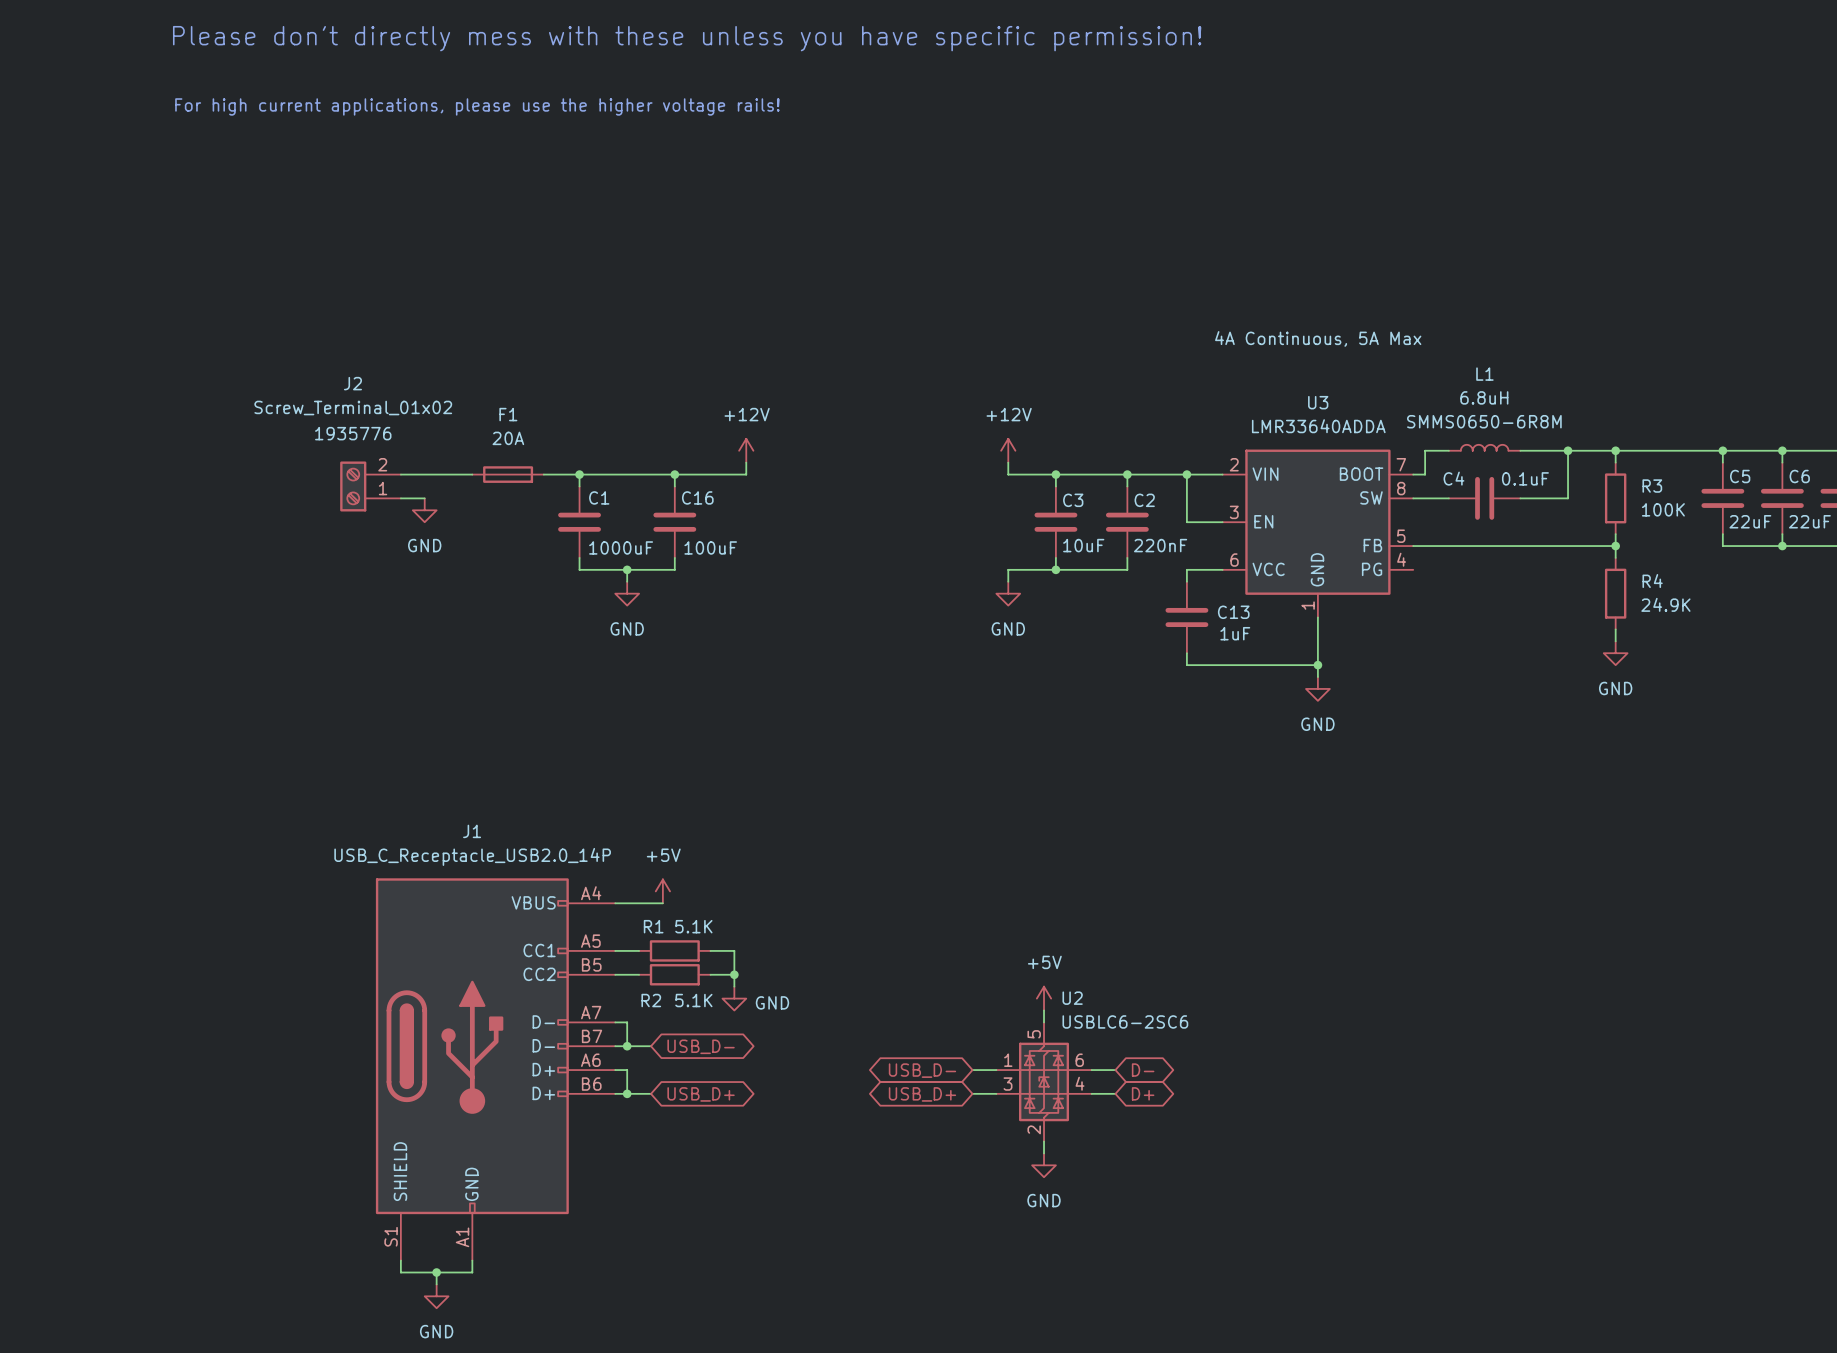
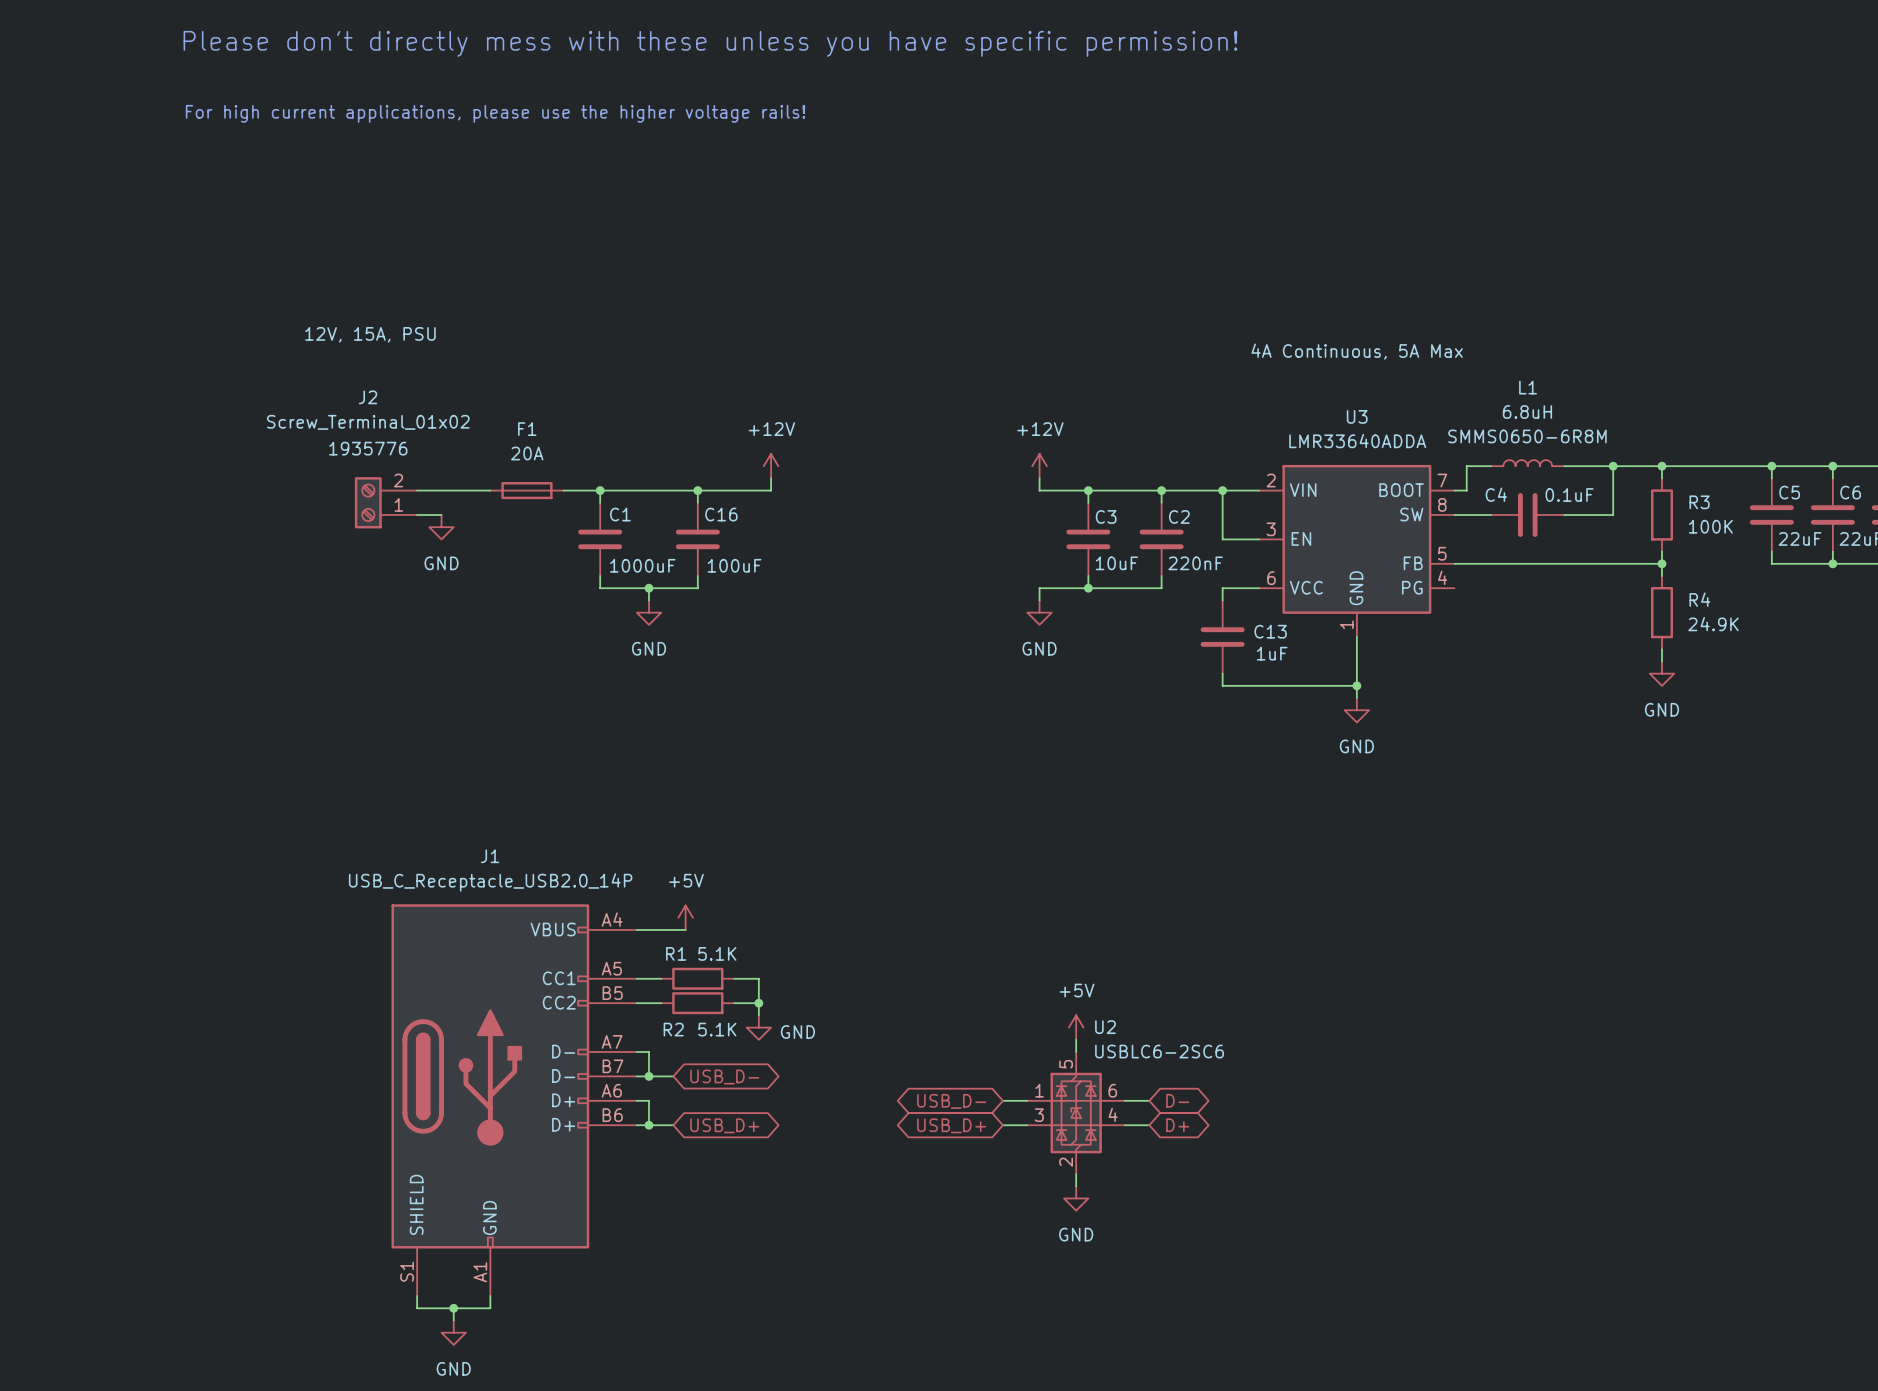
J2 text: none -> 12V, 15A, PSU (370, 334)

